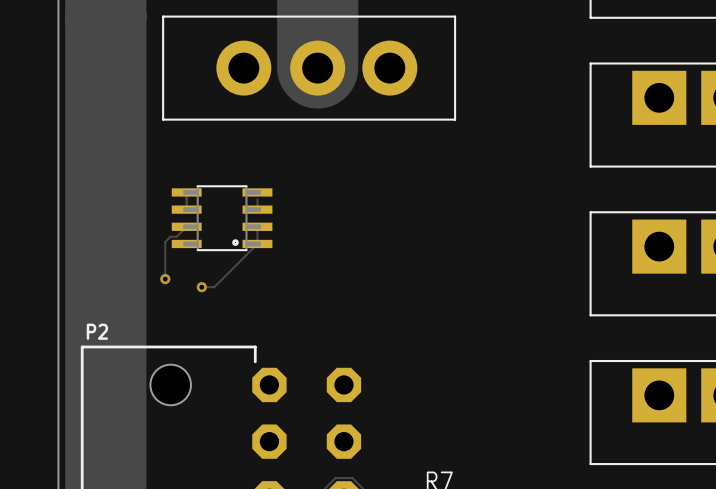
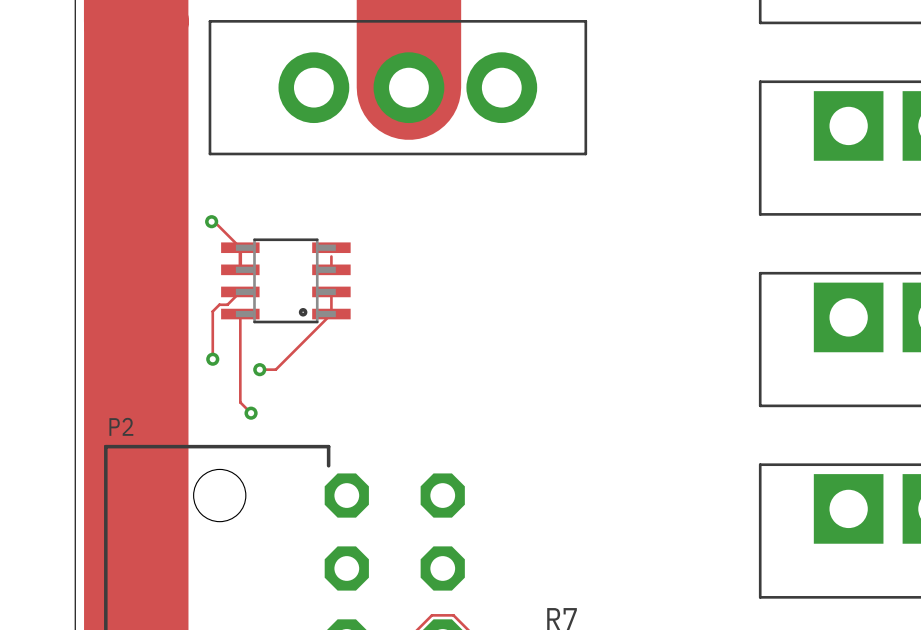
track: none -> (211, 221) (214, 221) (240, 247)
via: none -> (211, 221)
track: none -> (240, 314) (240, 402) (251, 413)
via: none -> (251, 413)

